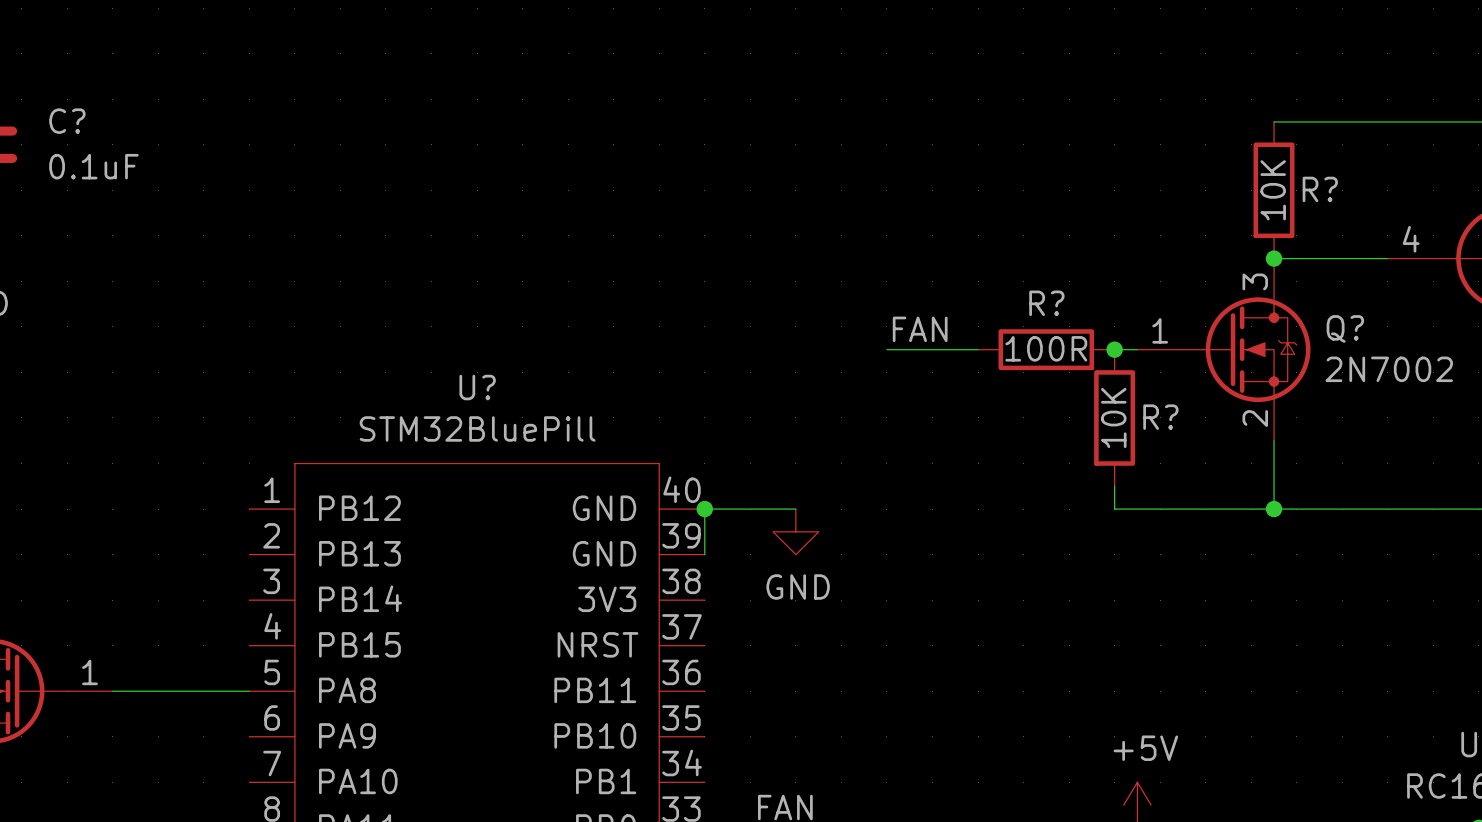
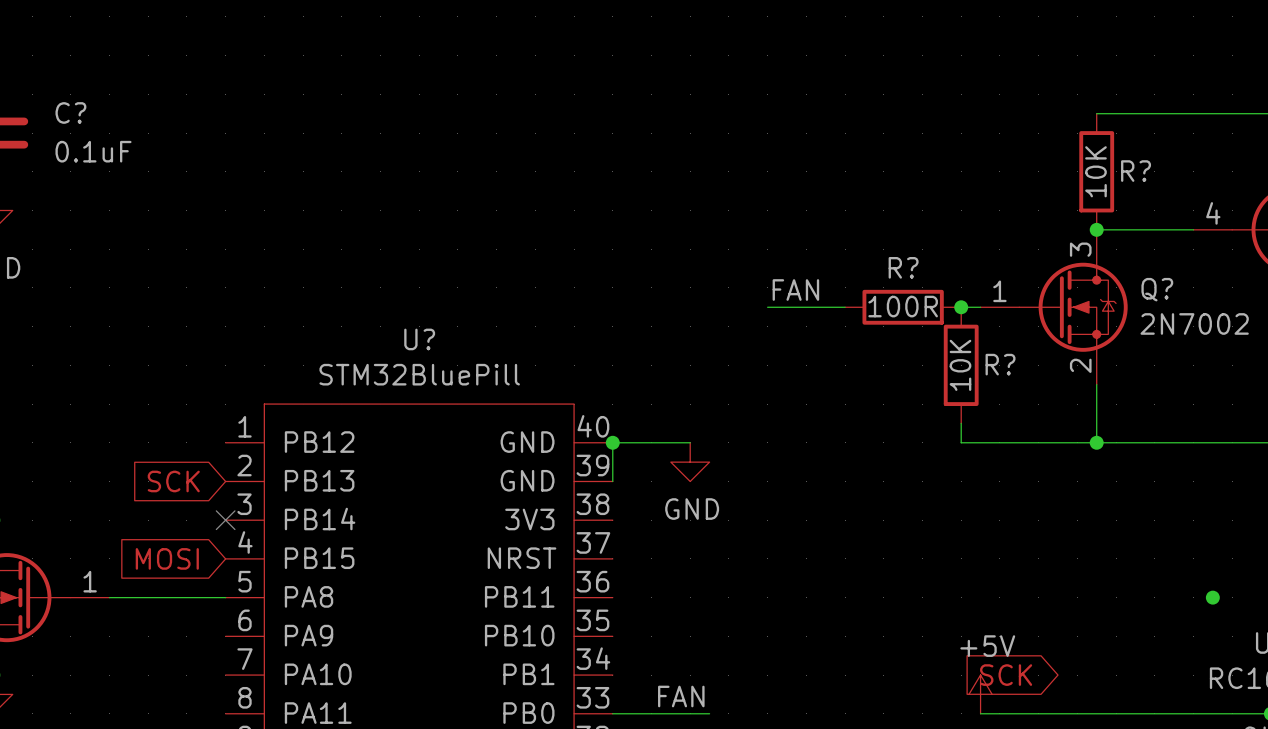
global label: none -> SCK (173, 481)
no-connect mark: none -> (225, 520)
global label: none -> MOSI (167, 558)
junction: none -> (1212, 597)
global label: none -> SCK (1006, 675)

